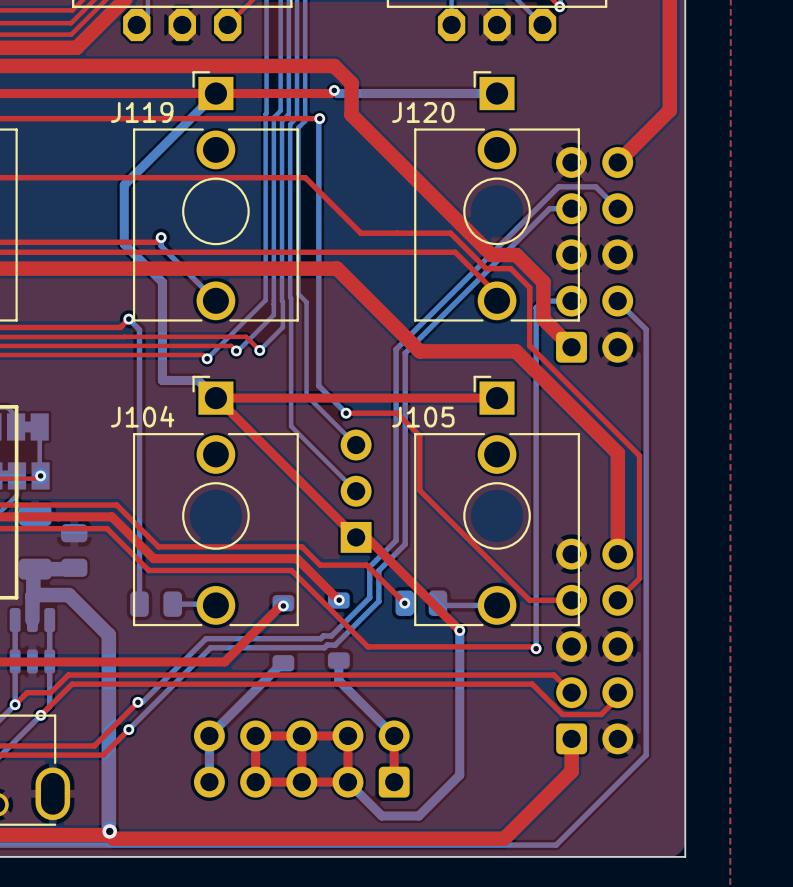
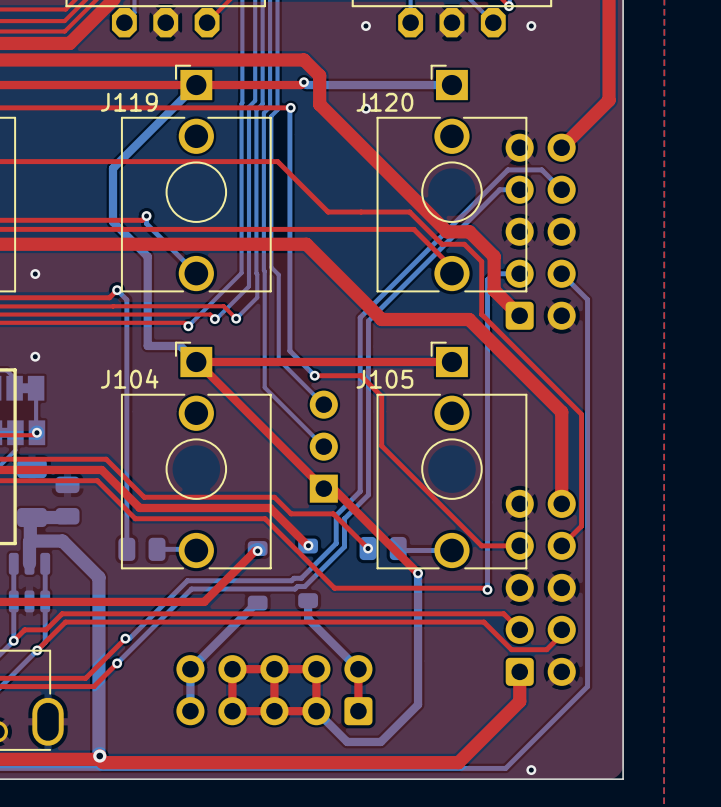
via: none -> (365, 26)
via: none -> (531, 26)
via: none -> (365, 108)
via: none -> (35, 274)
via: none -> (35, 356)
via: none -> (531, 770)

